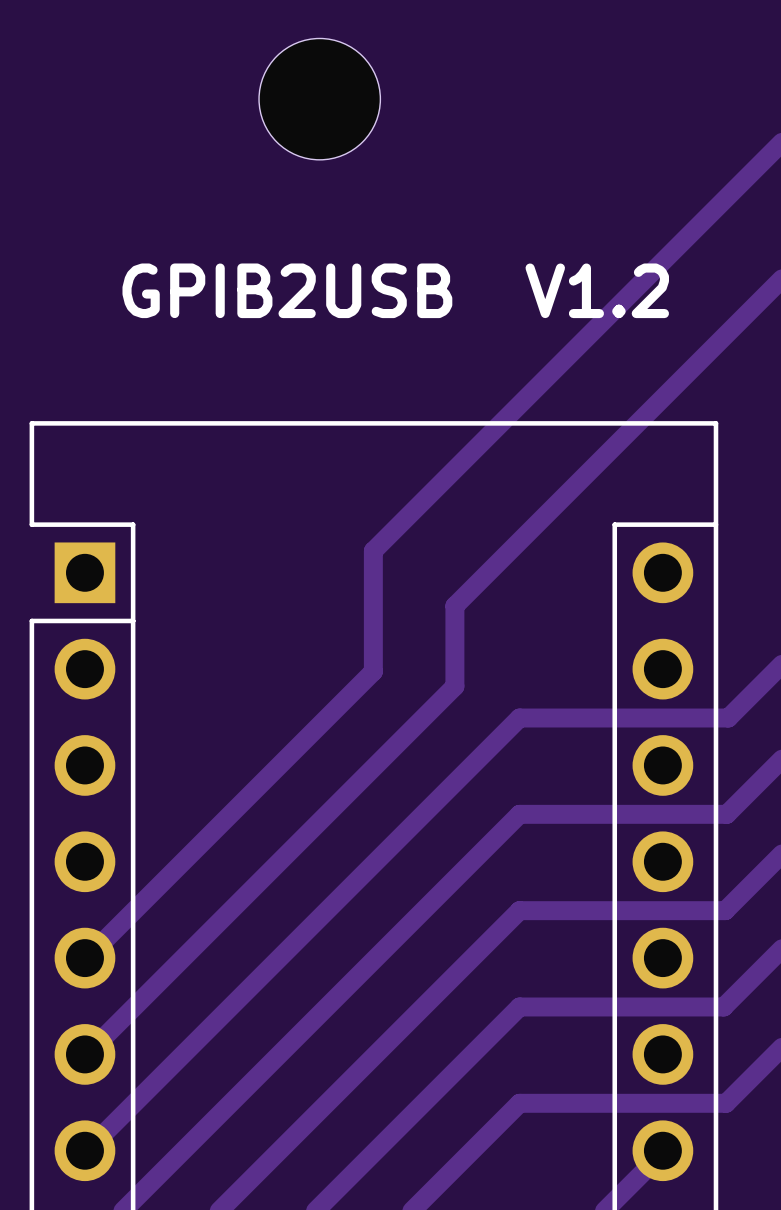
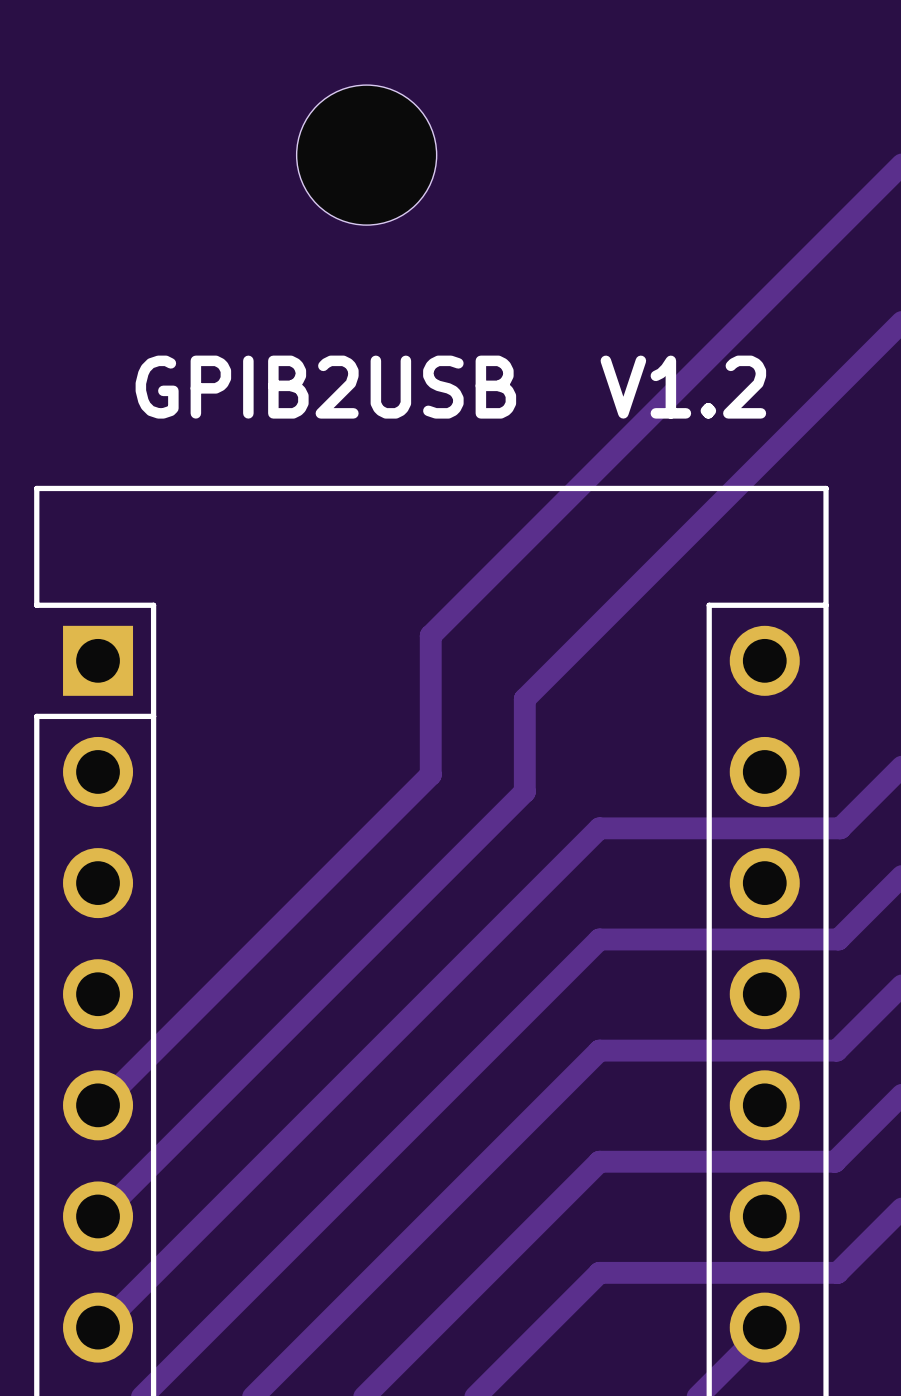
part position: (319, 99) -> (366, 155)
text position: GPIB2USB V1.2 (395, 290) -> GPIB2USB V1.2 (450, 387)

